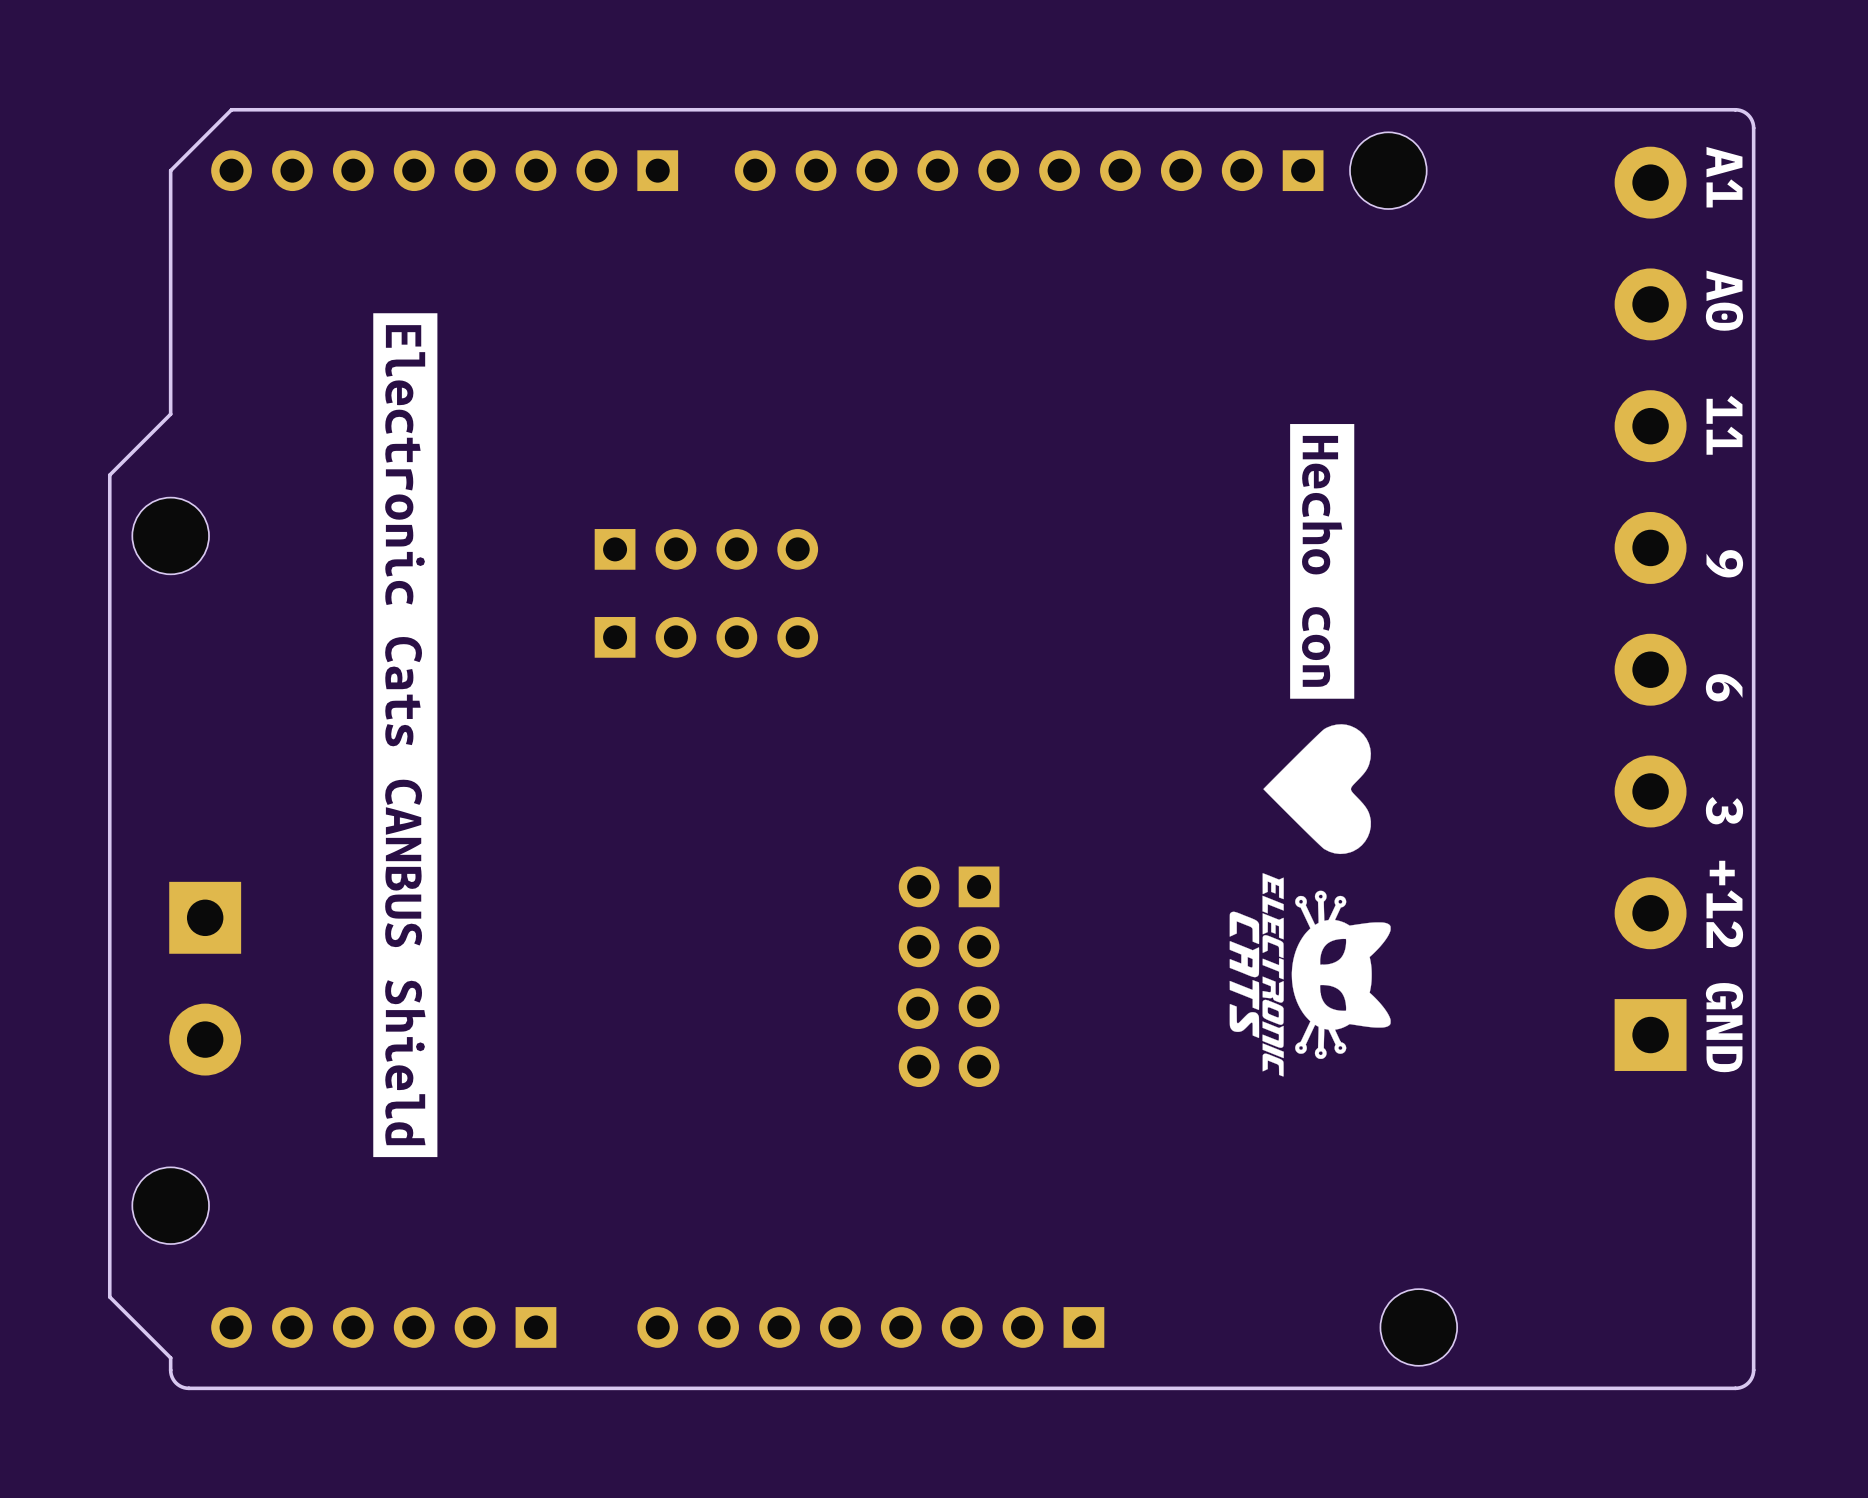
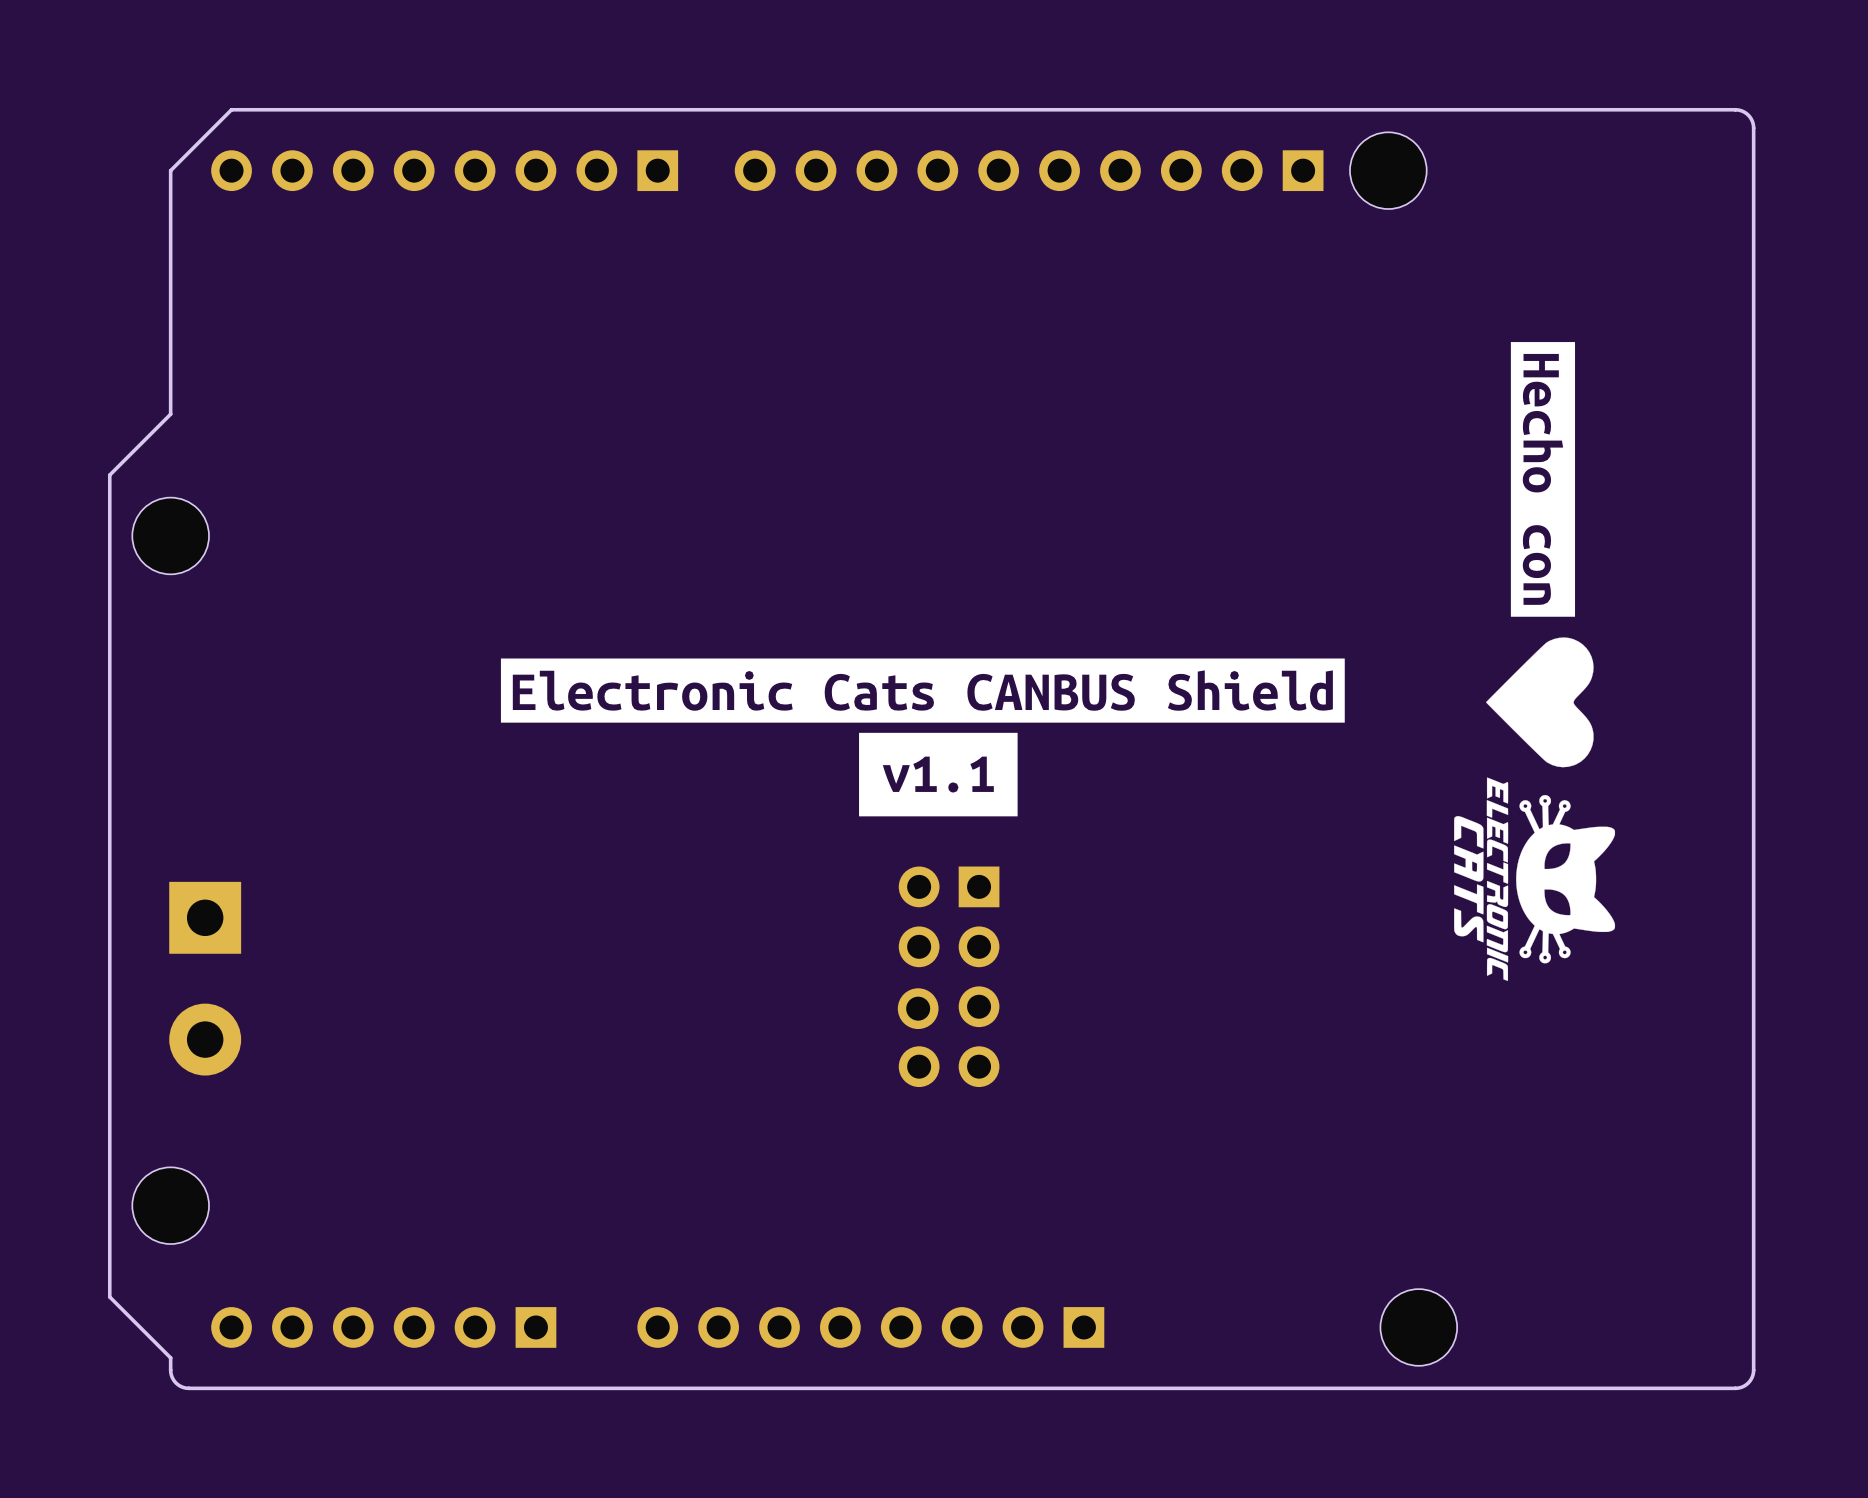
drawing: [373, 313, 438, 1158] -> none
part: (706, 549) -> none
drawing position: (1322, 561) -> (1542, 479)
part: (1650, 608) -> none
text: A1 A0 11 9 6 3 +12 GND (1724, 609) -> none
part: (706, 637) -> none
drawing: none -> [500, 658, 1345, 817]
drawing position: (1317, 789) -> (1539, 702)
drawing position: (1310, 974) -> (1534, 879)

